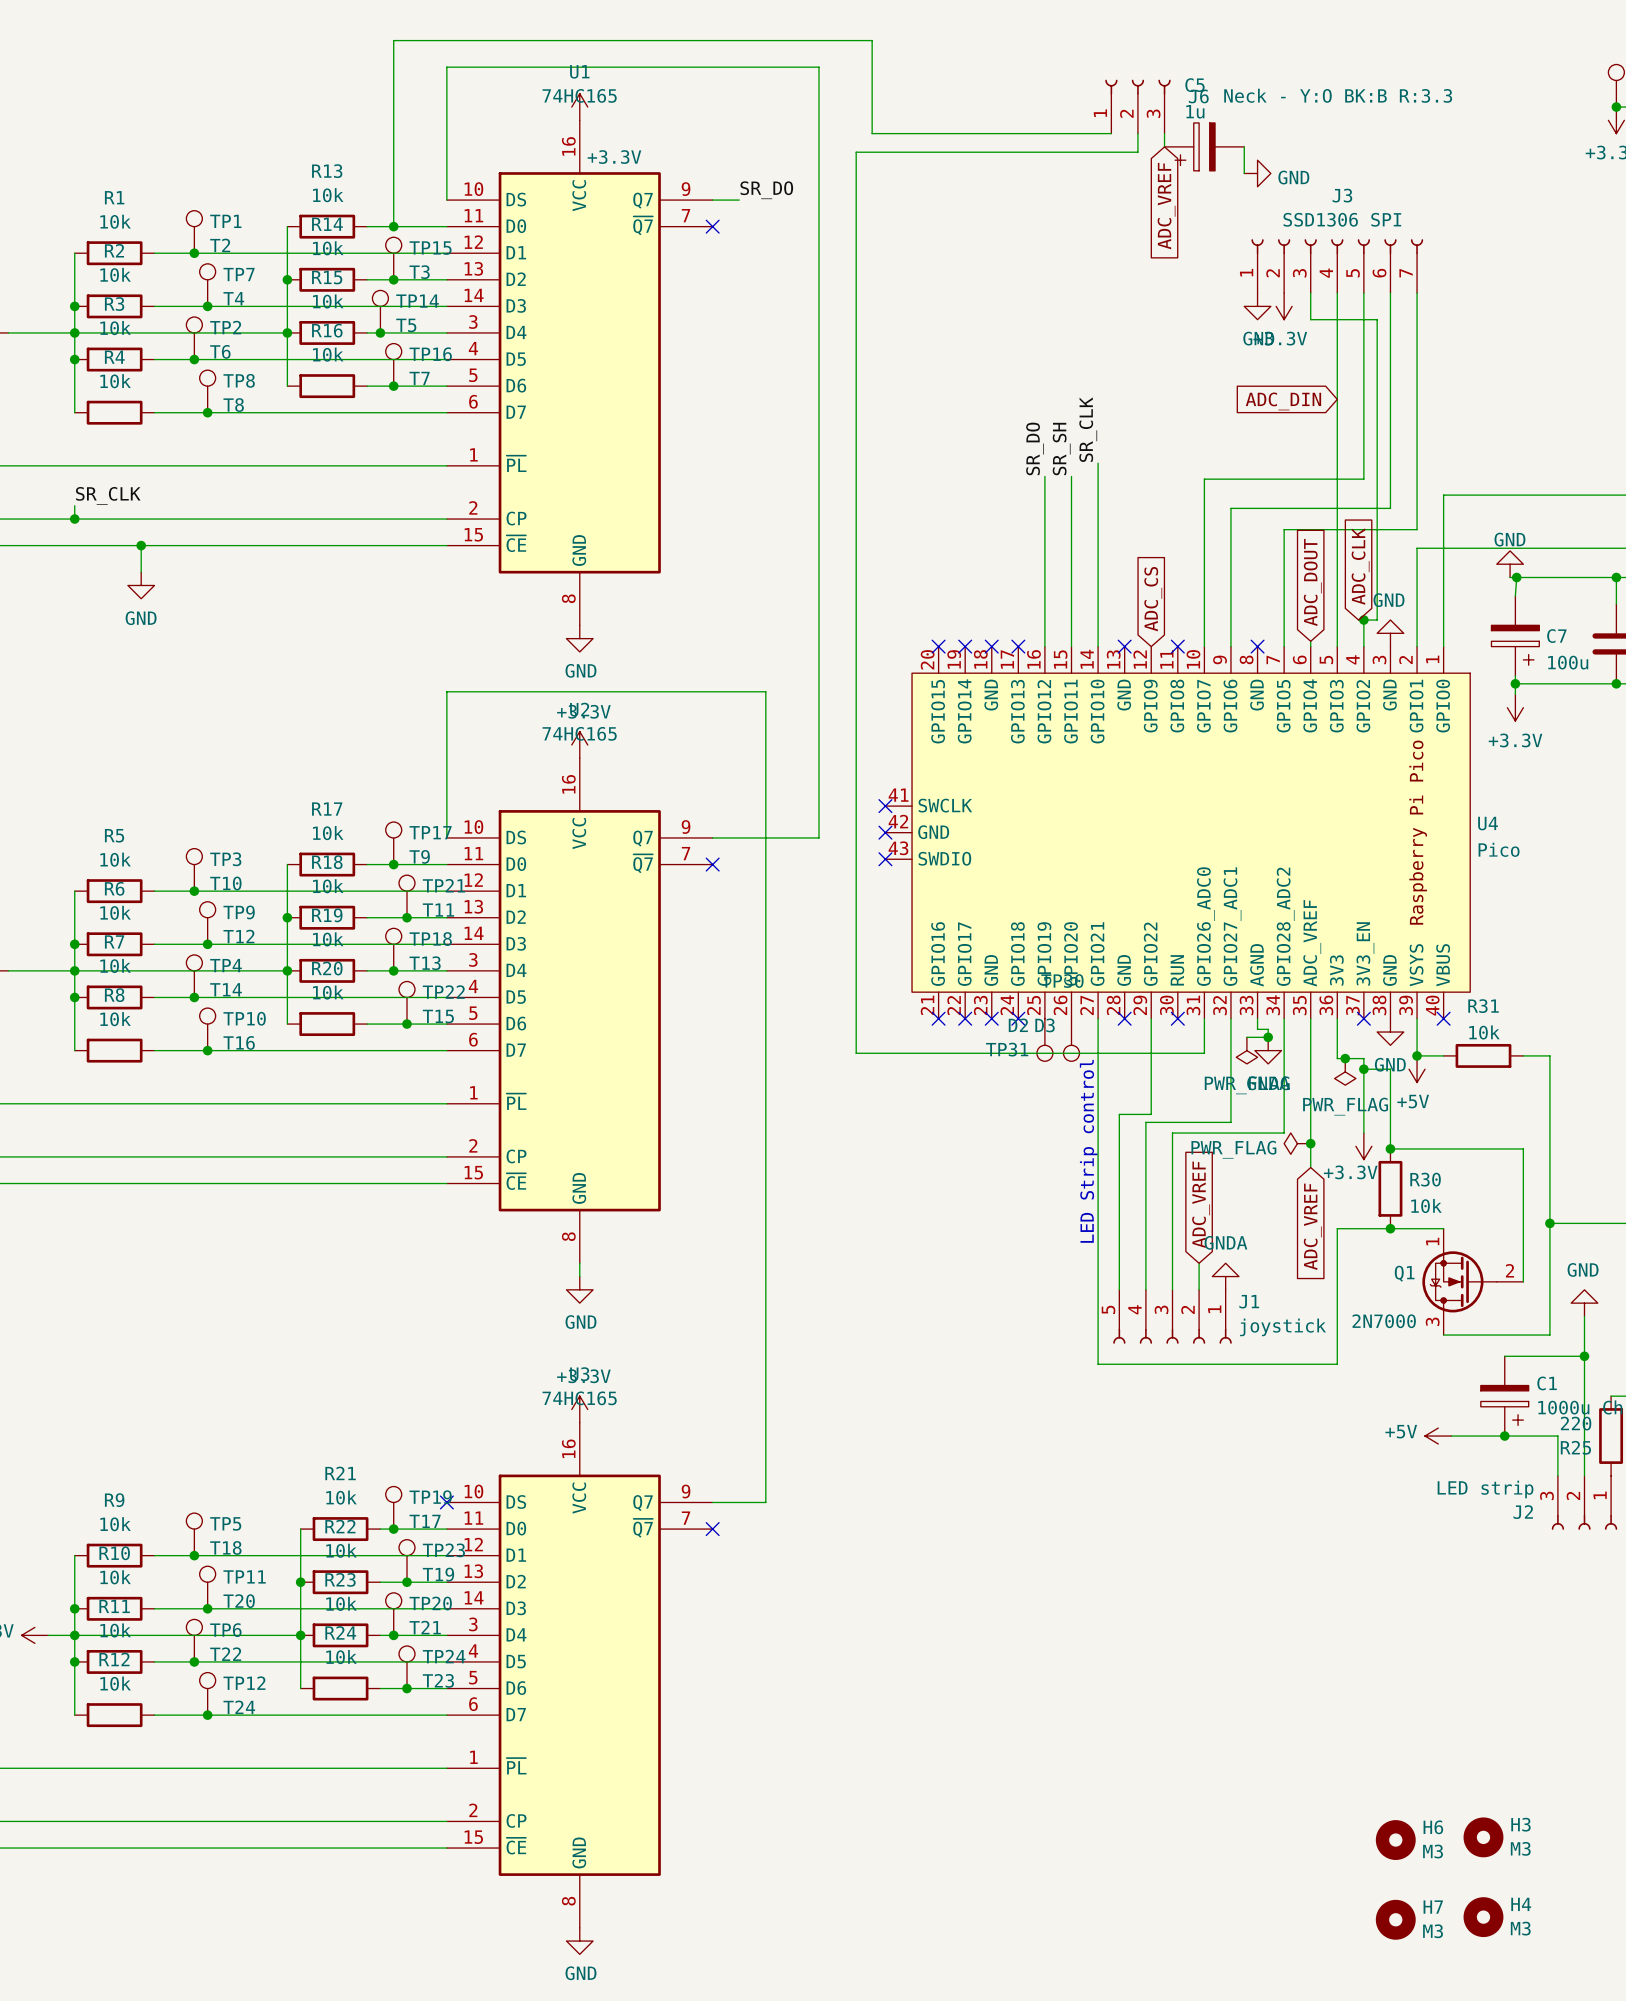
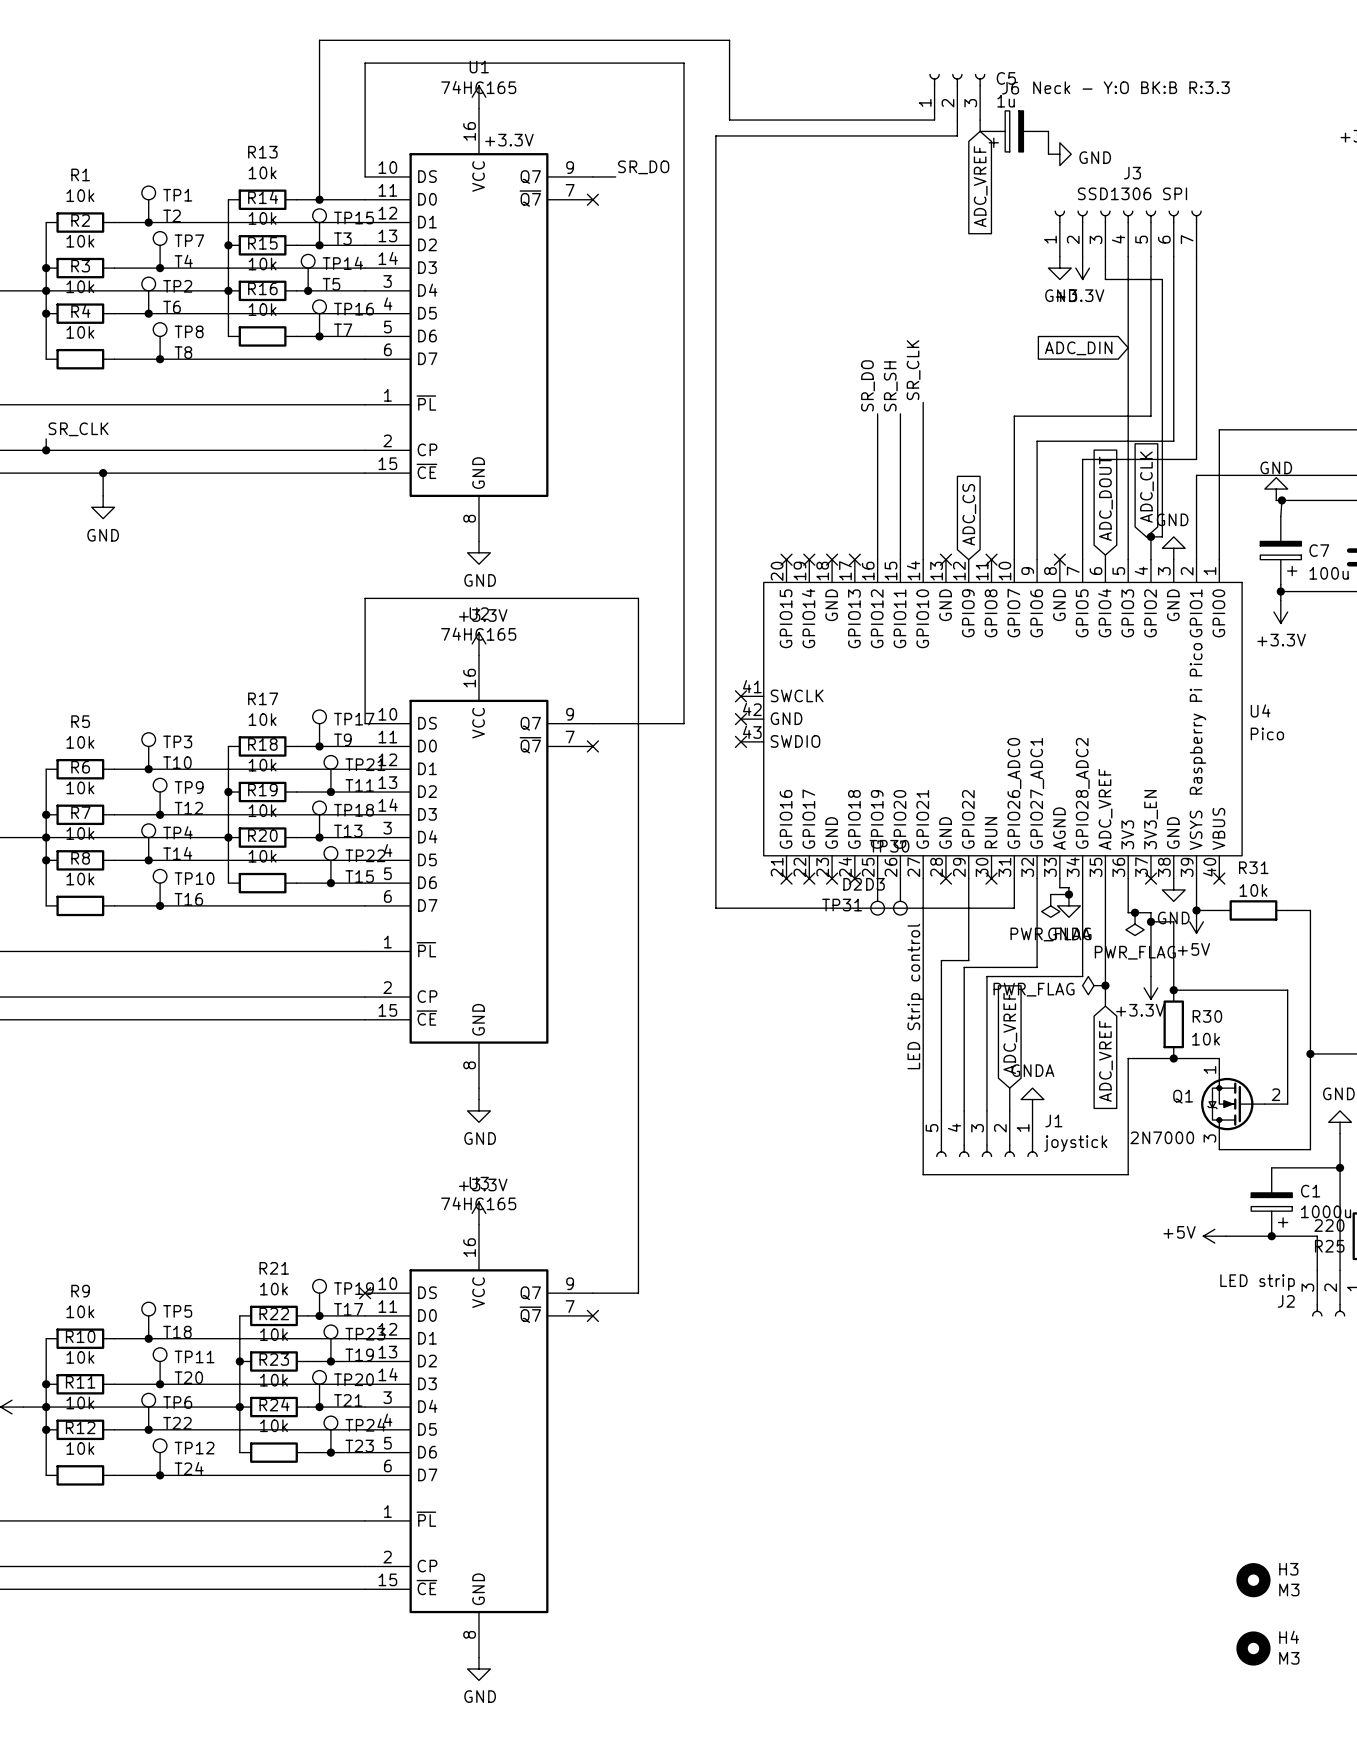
H6: M3 (1395, 1840) -> none
H7: M3 (1395, 1919) -> none

